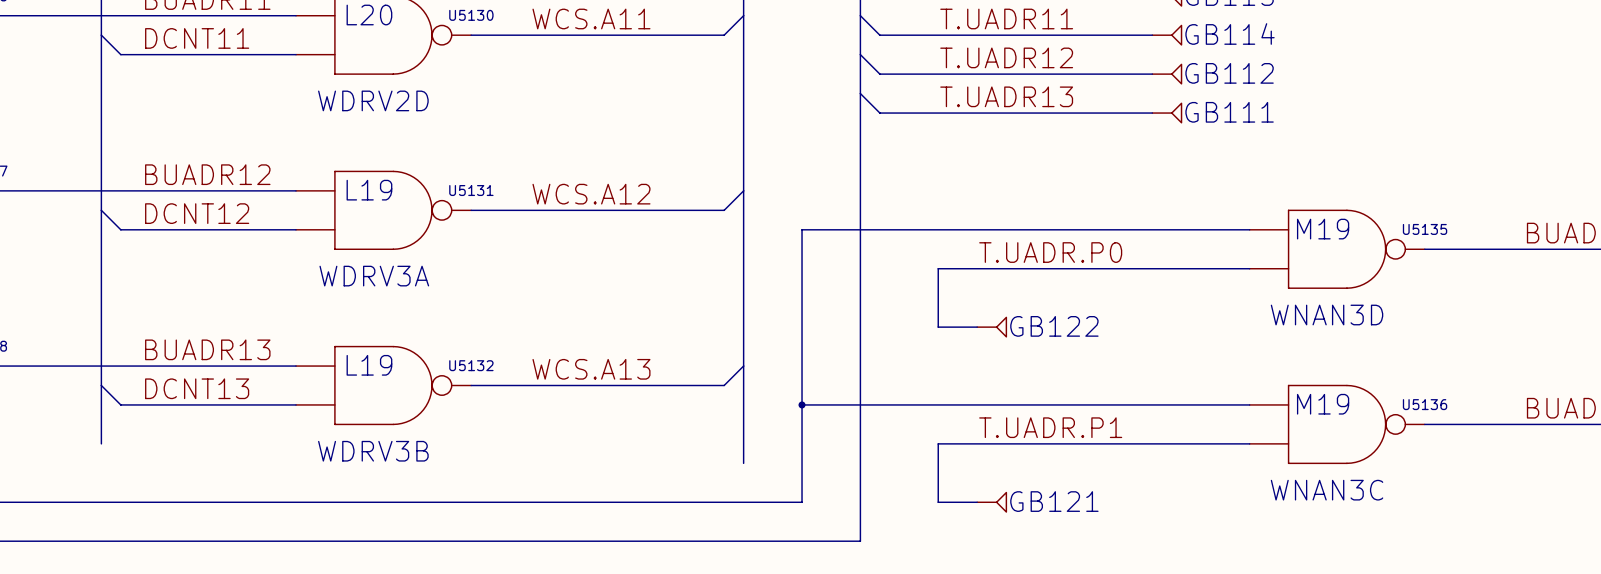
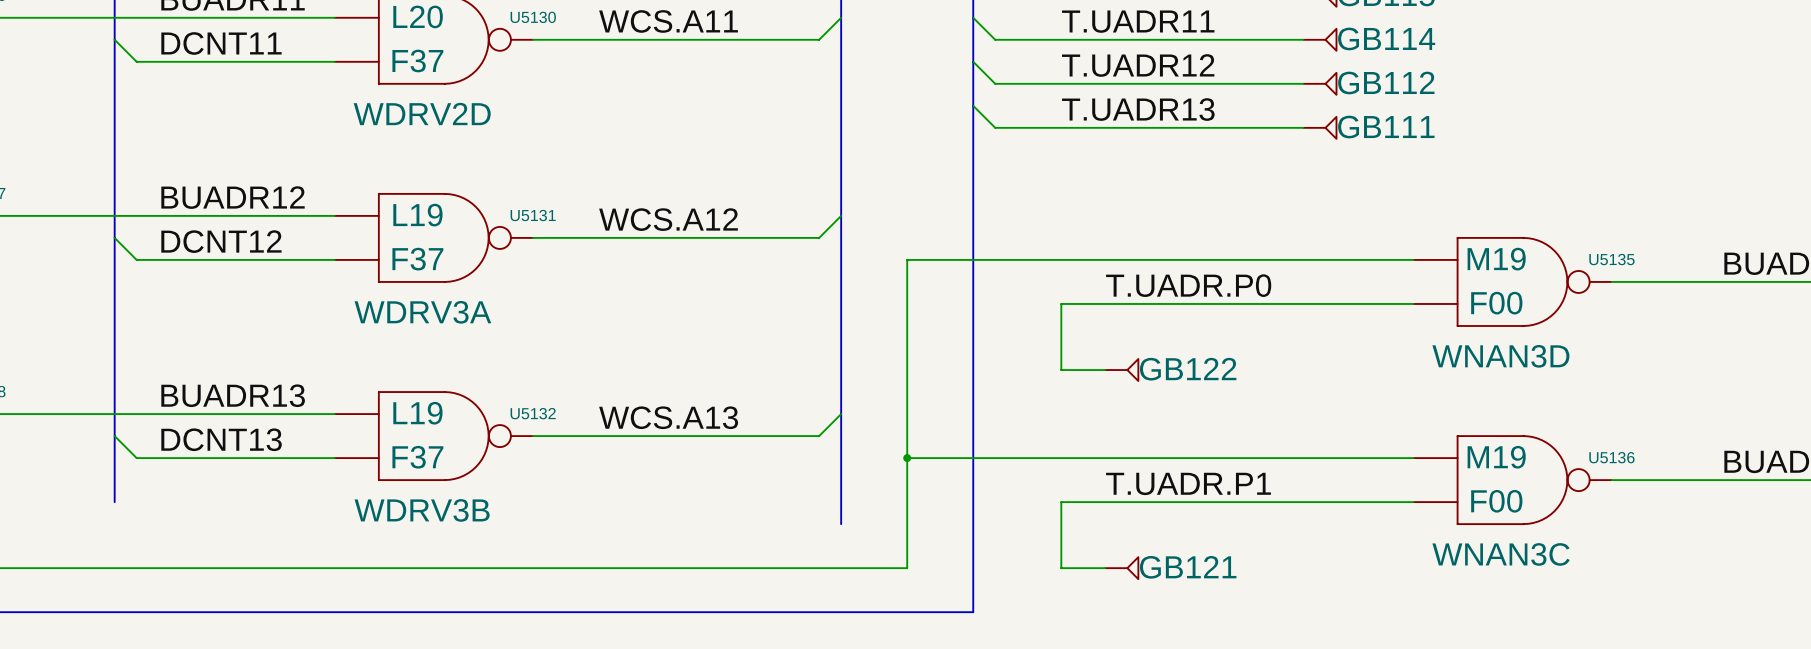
U5130 value: none -> F37 (417, 60)
U5131 value: none -> F37 (417, 259)
U5135 value: none -> F00 (1496, 303)
U5132 value: none -> F37 (417, 457)
U5136 value: none -> F00 (1496, 501)

